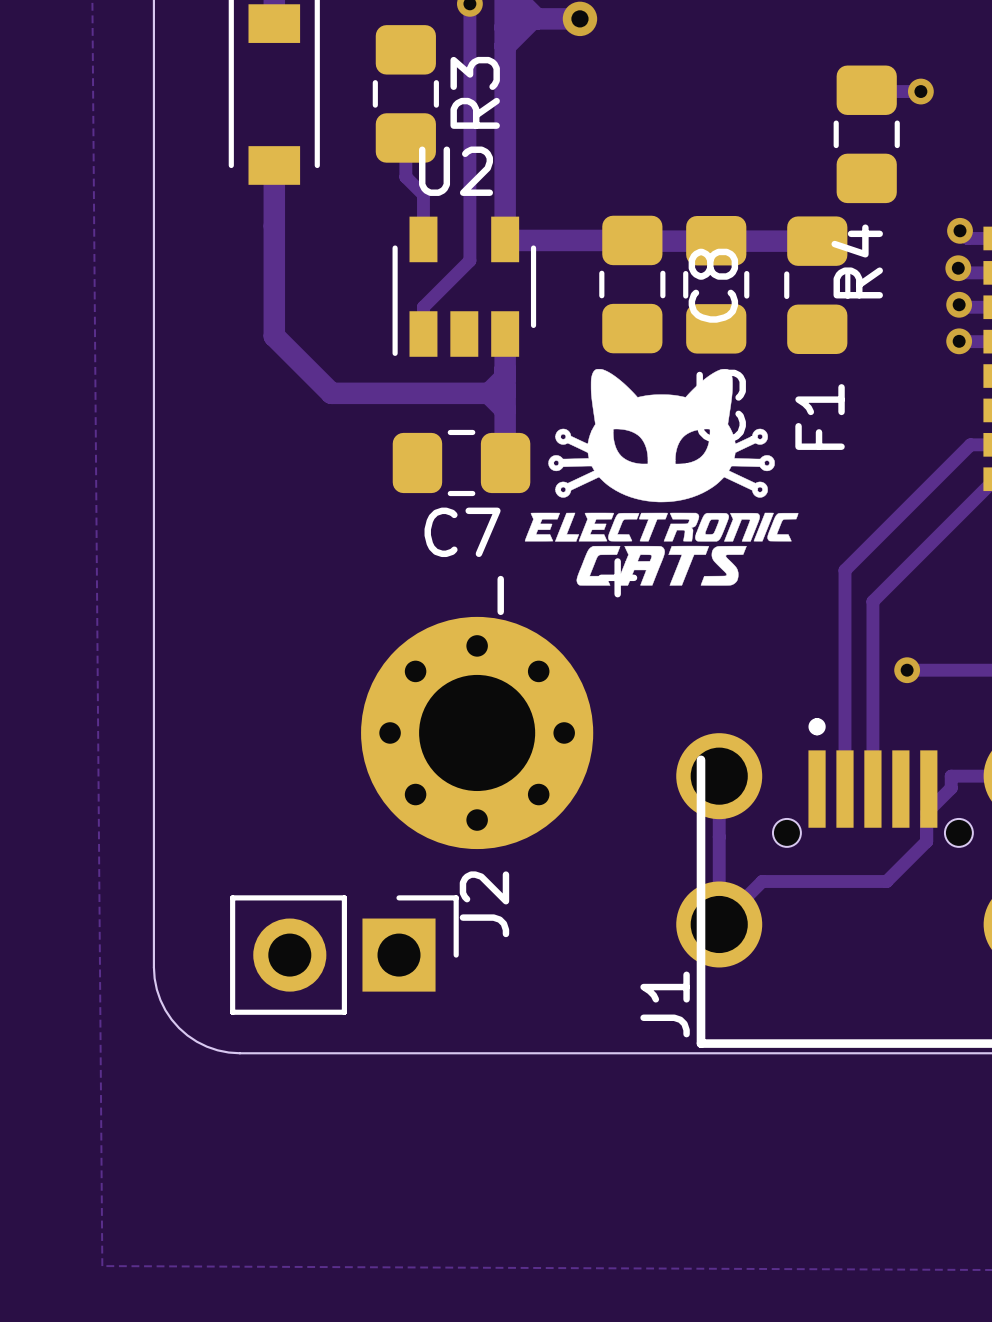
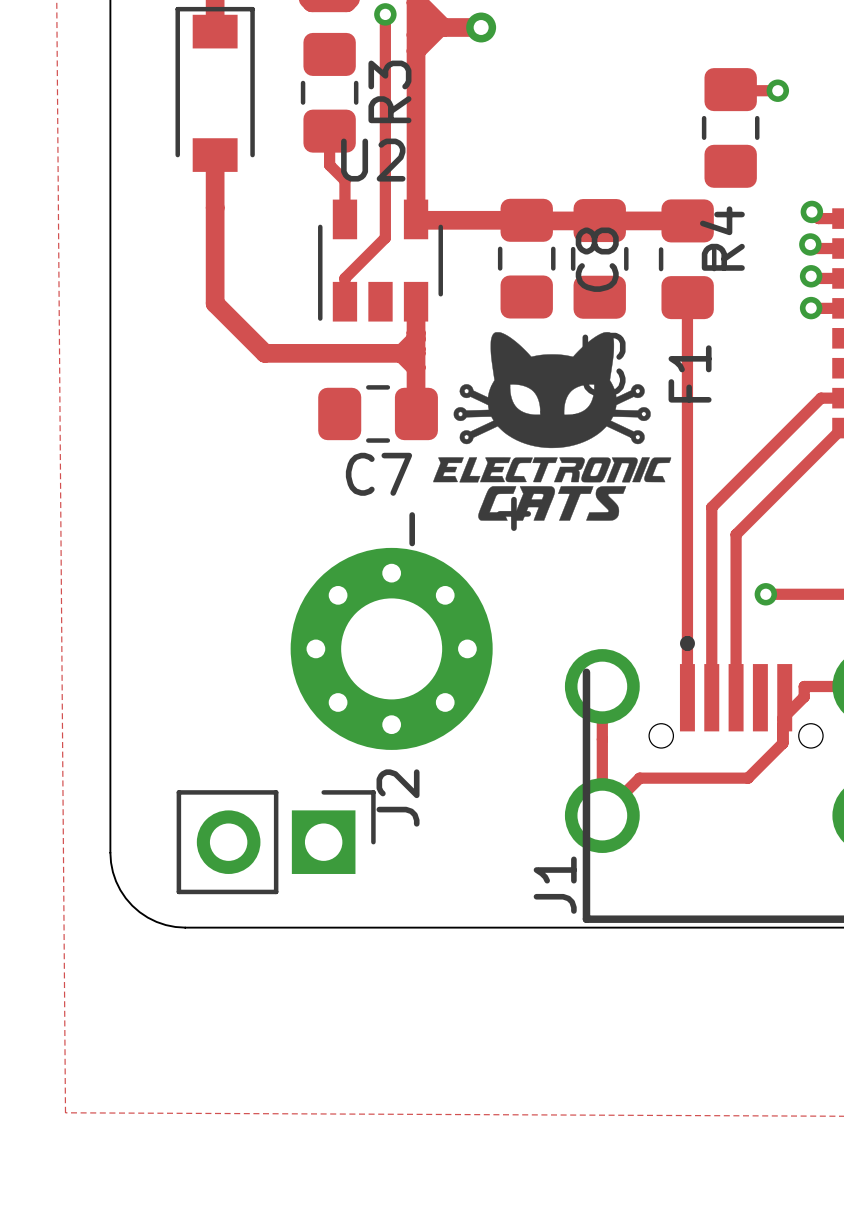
track: none -> (687, 297) (687, 697)

